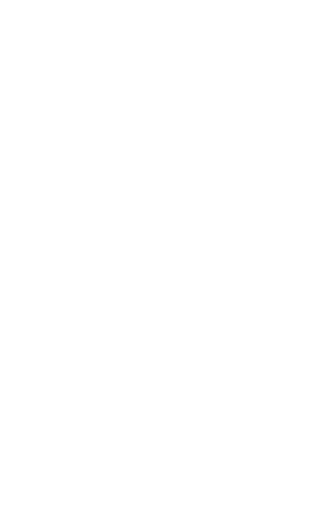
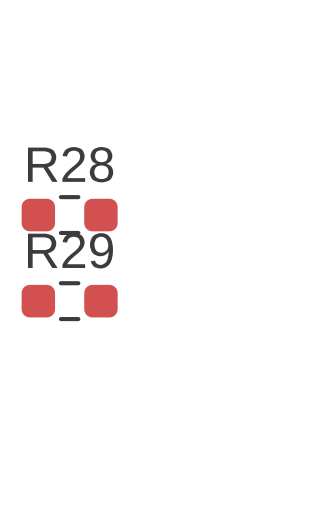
R28: none -> (69, 215)
R29: none -> (69, 301)

